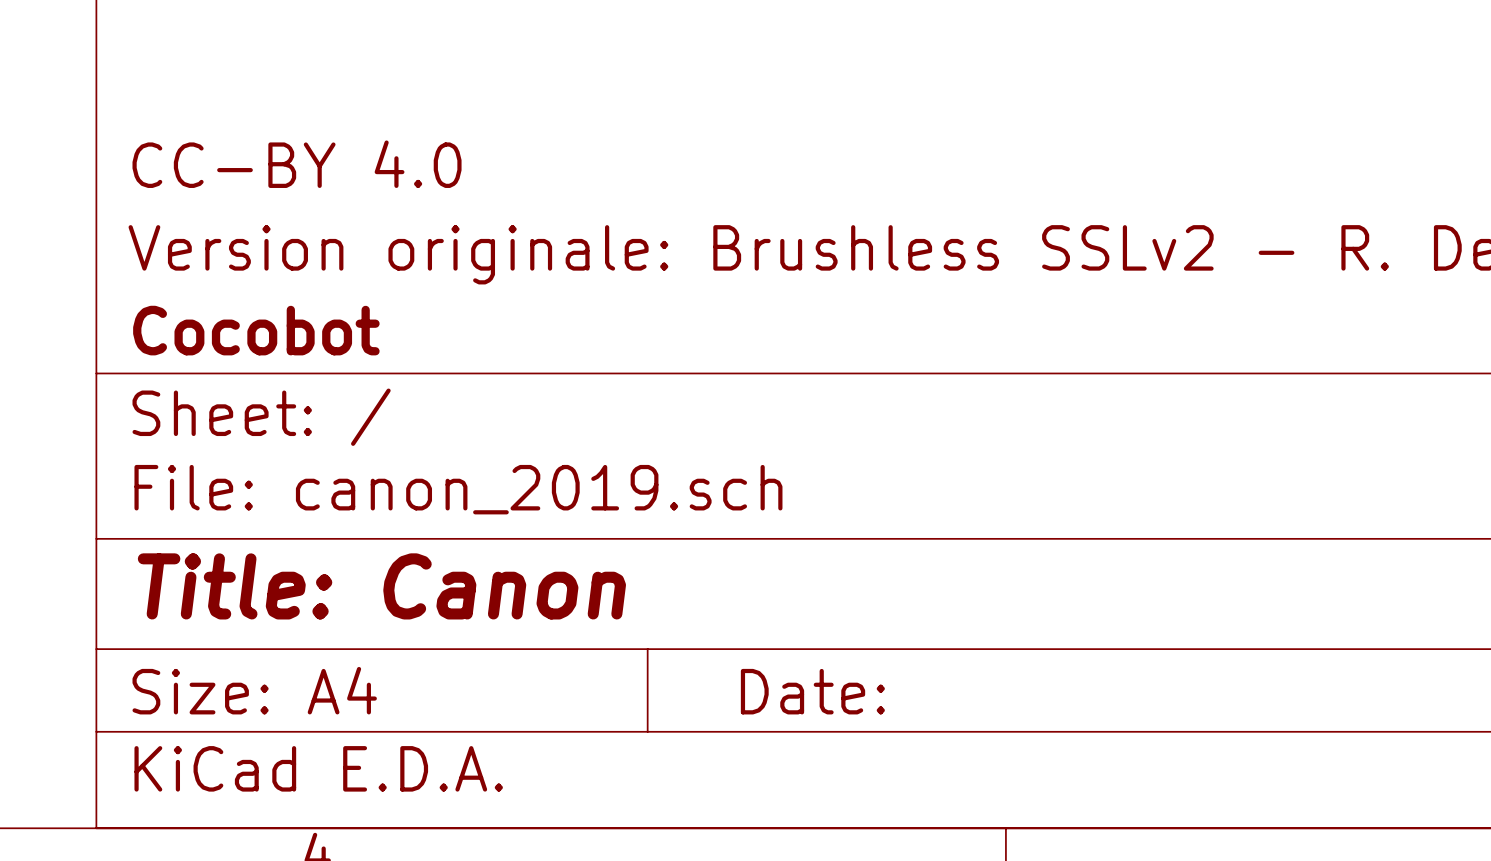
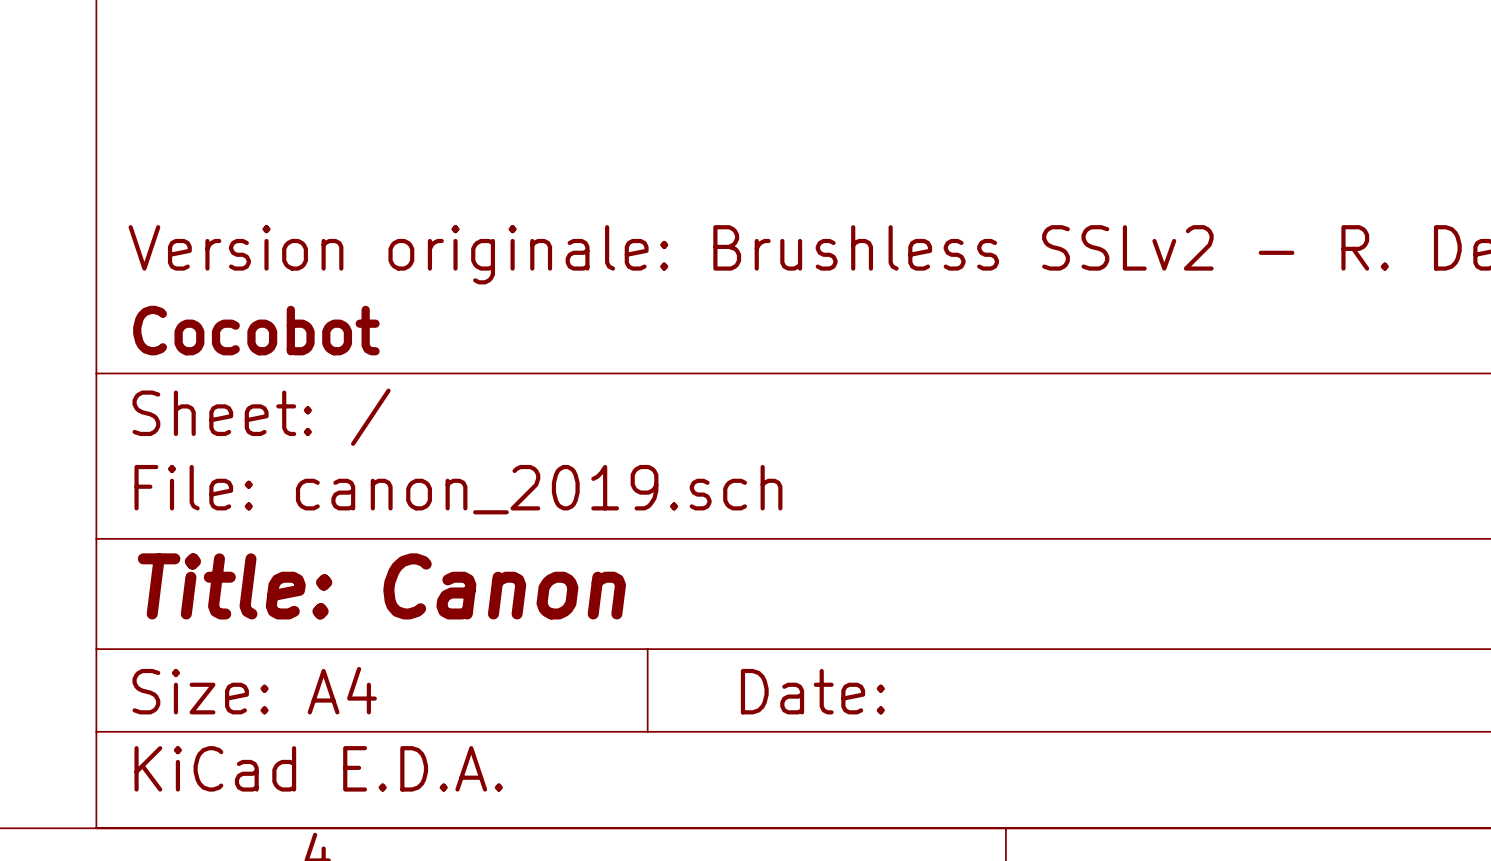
title block: CC-BY 4.0 (297, 164) -> none

